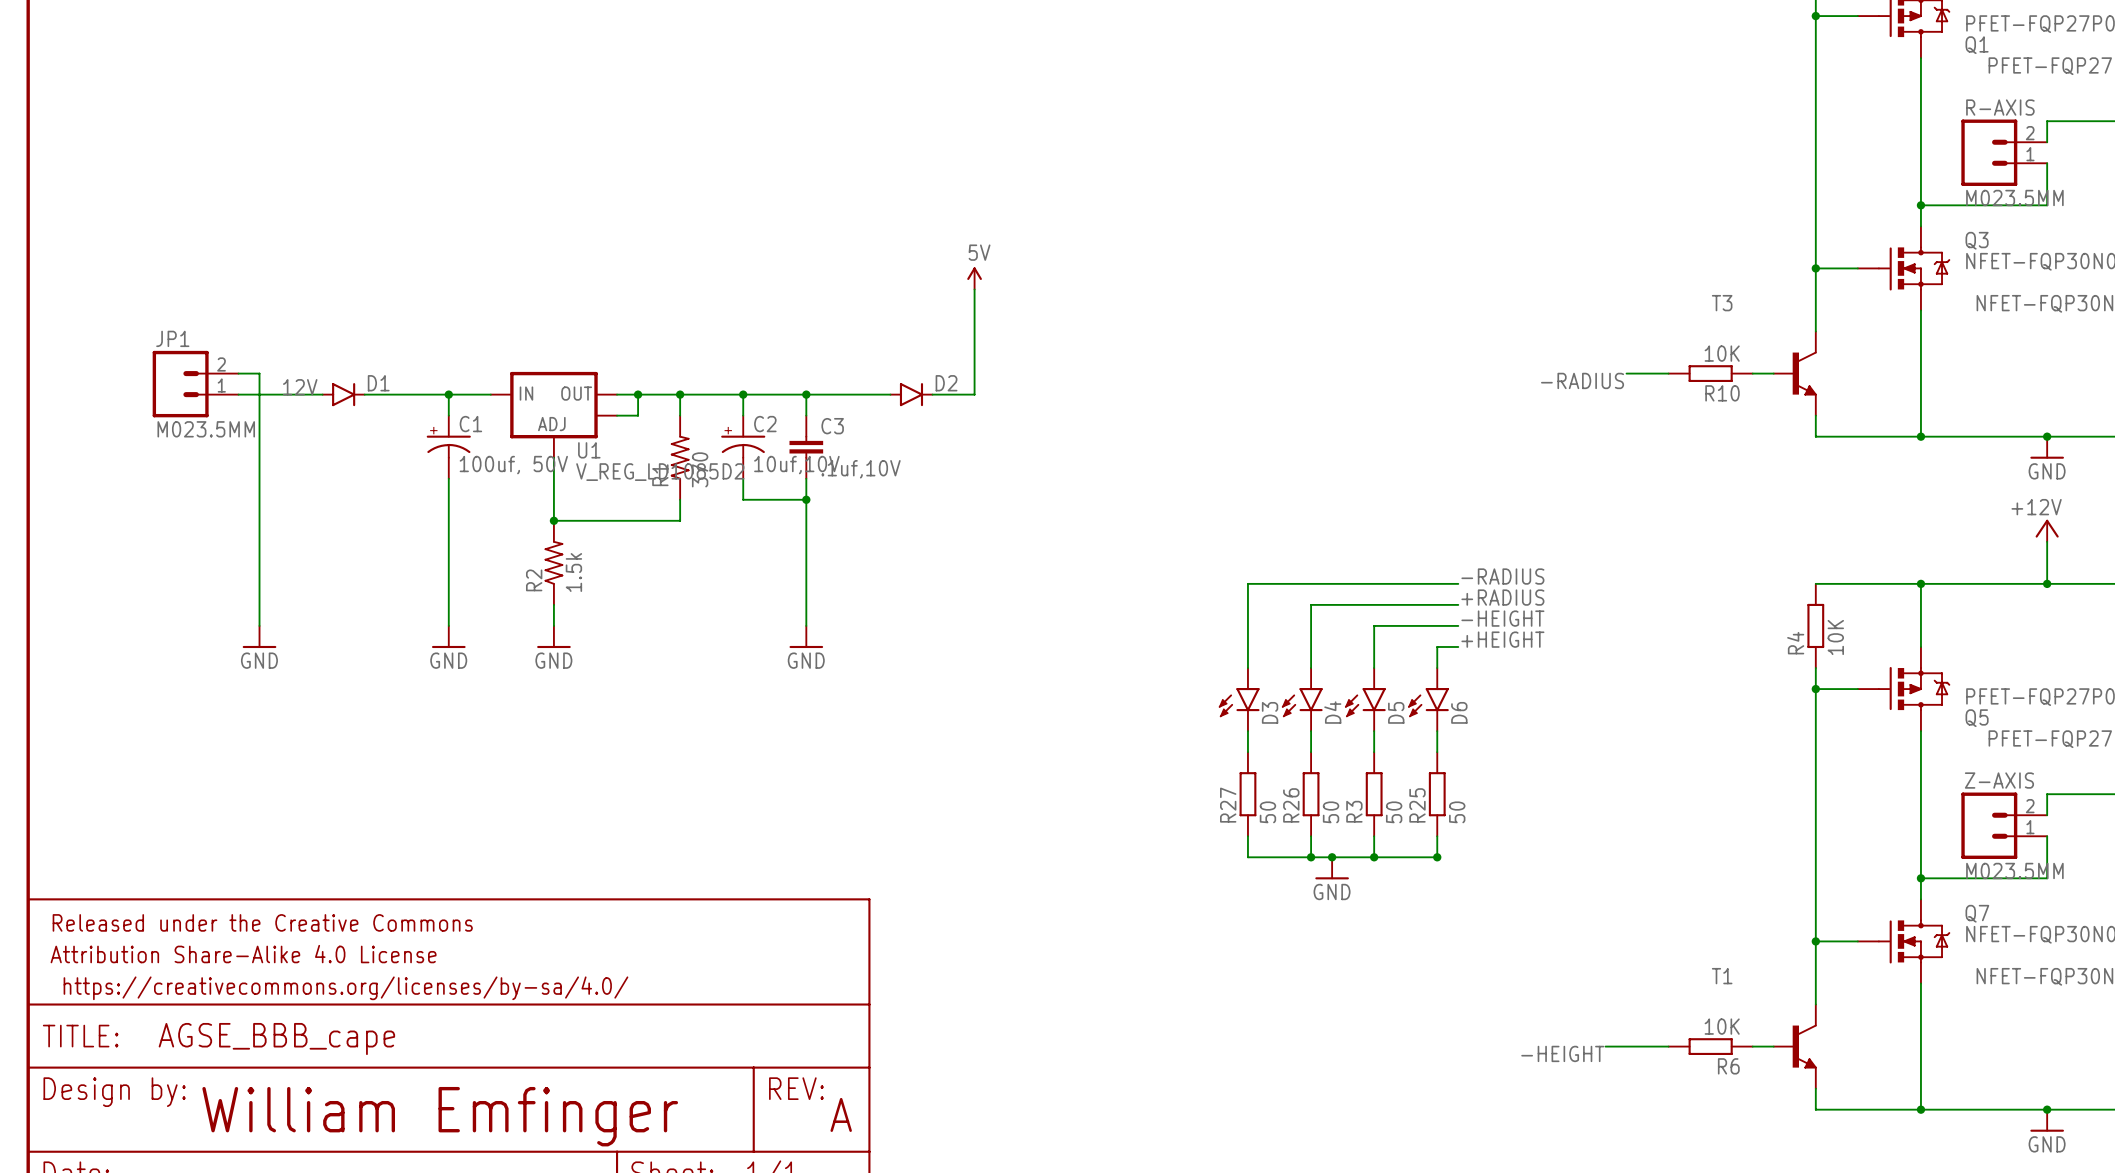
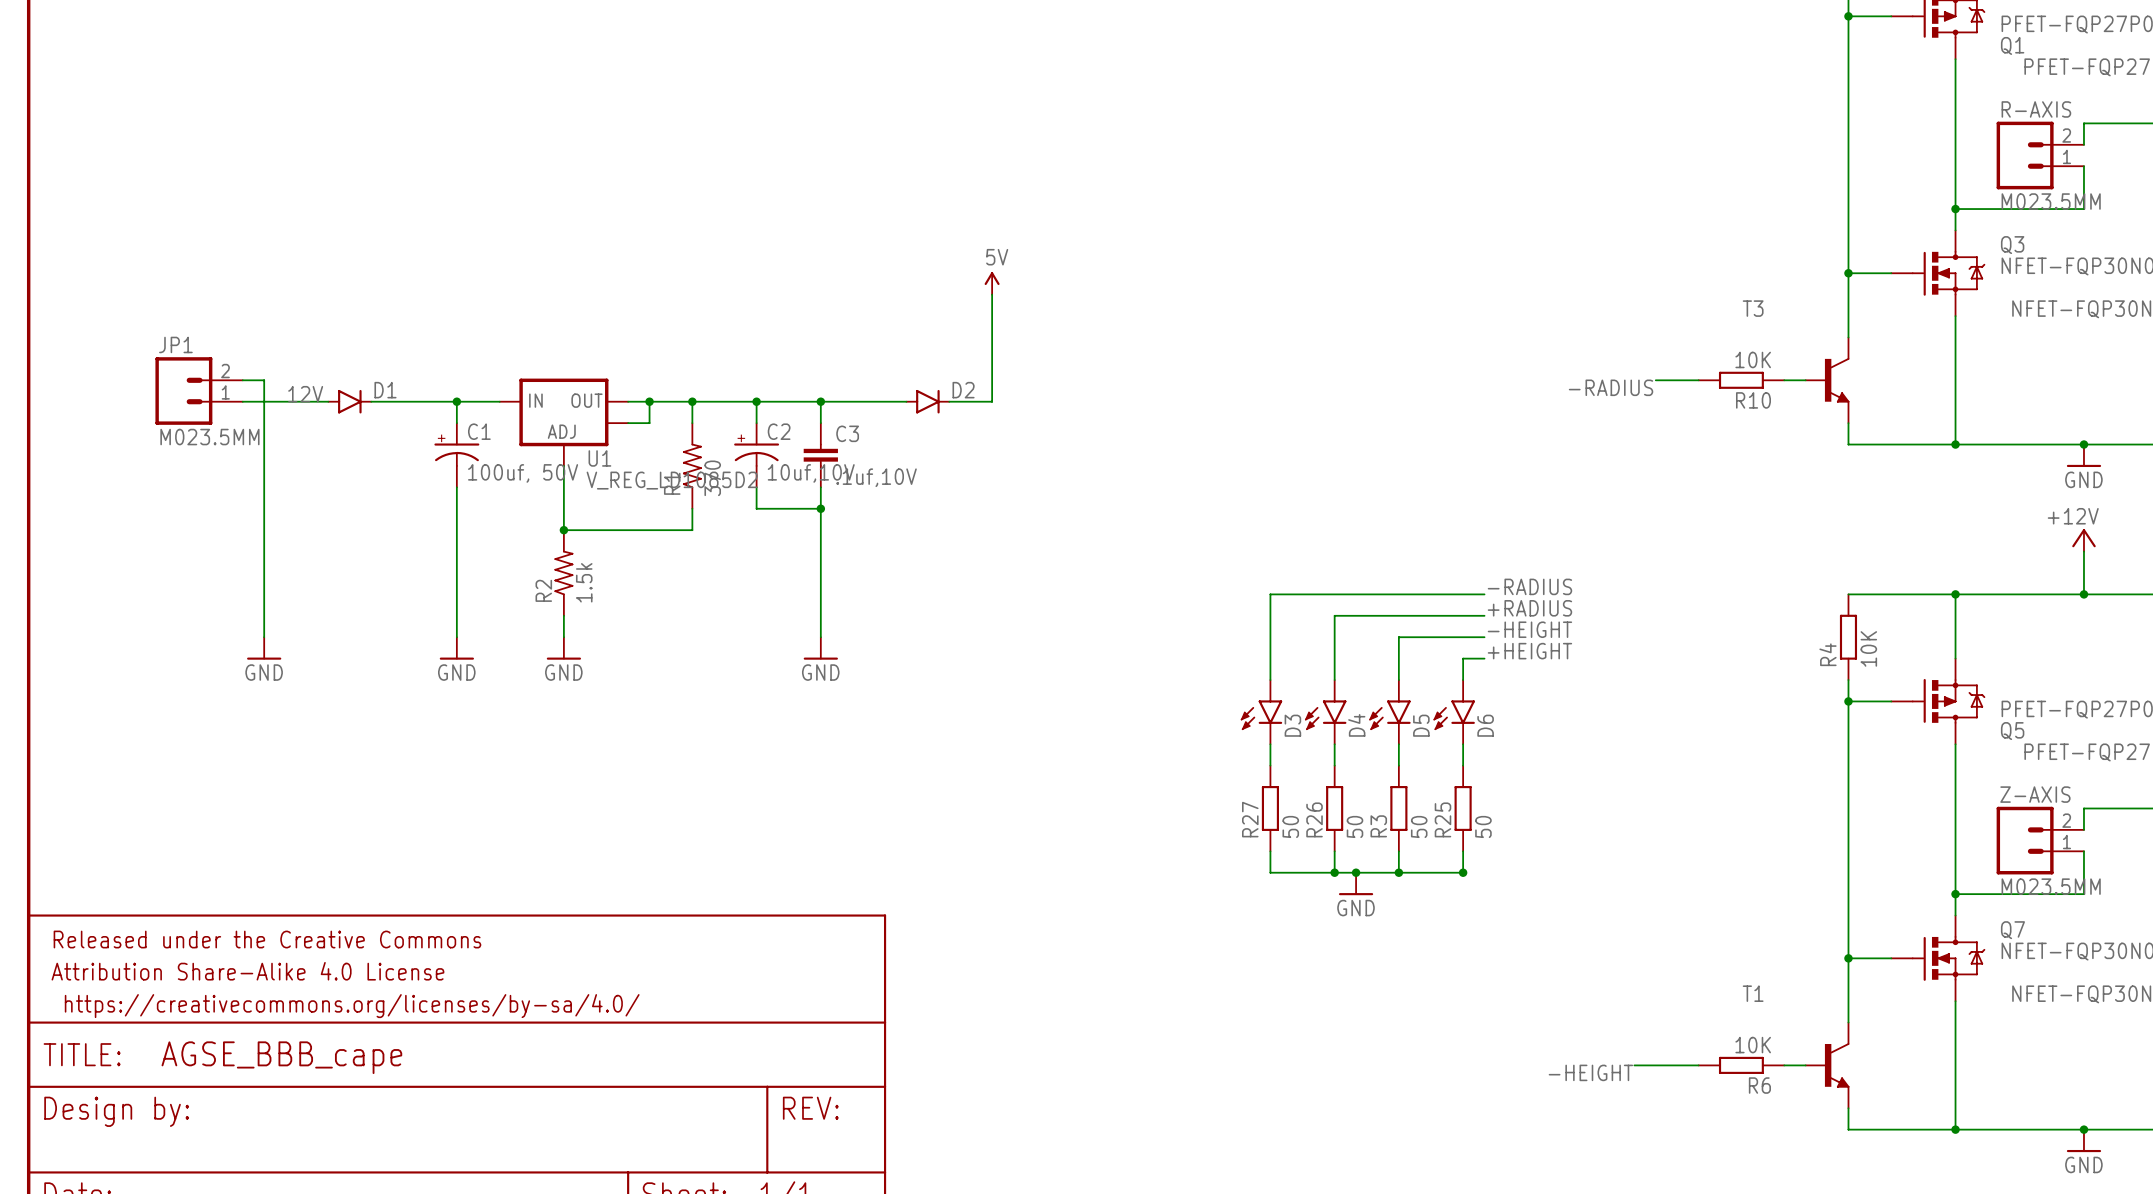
text: A (841, 1114) -> none
text: William Emfinger (440, 1116) -> none

